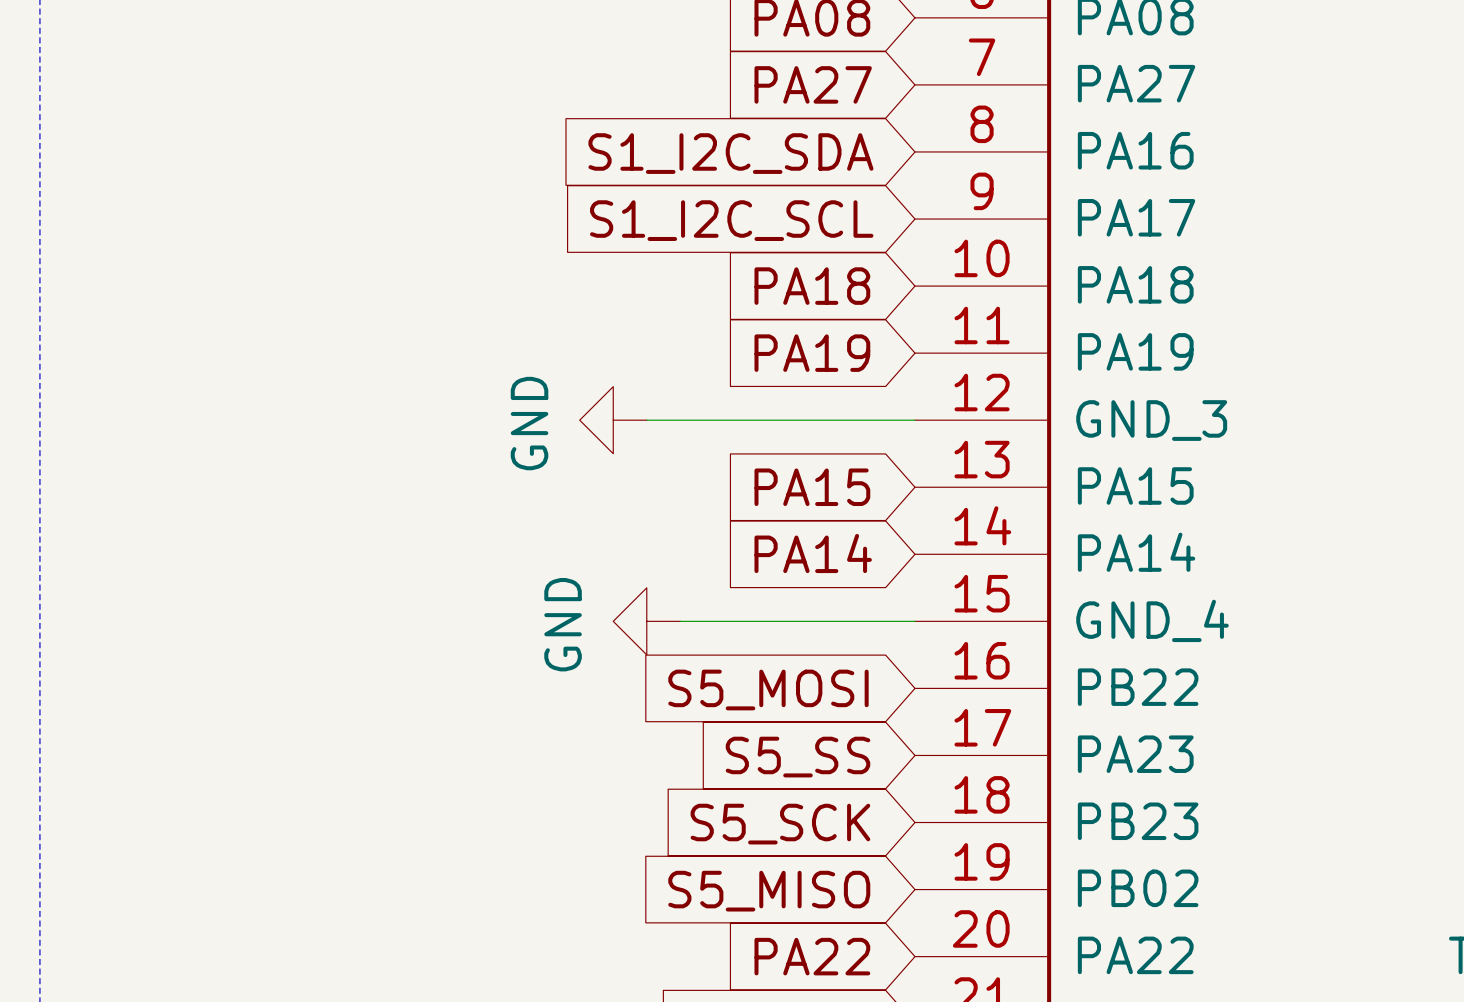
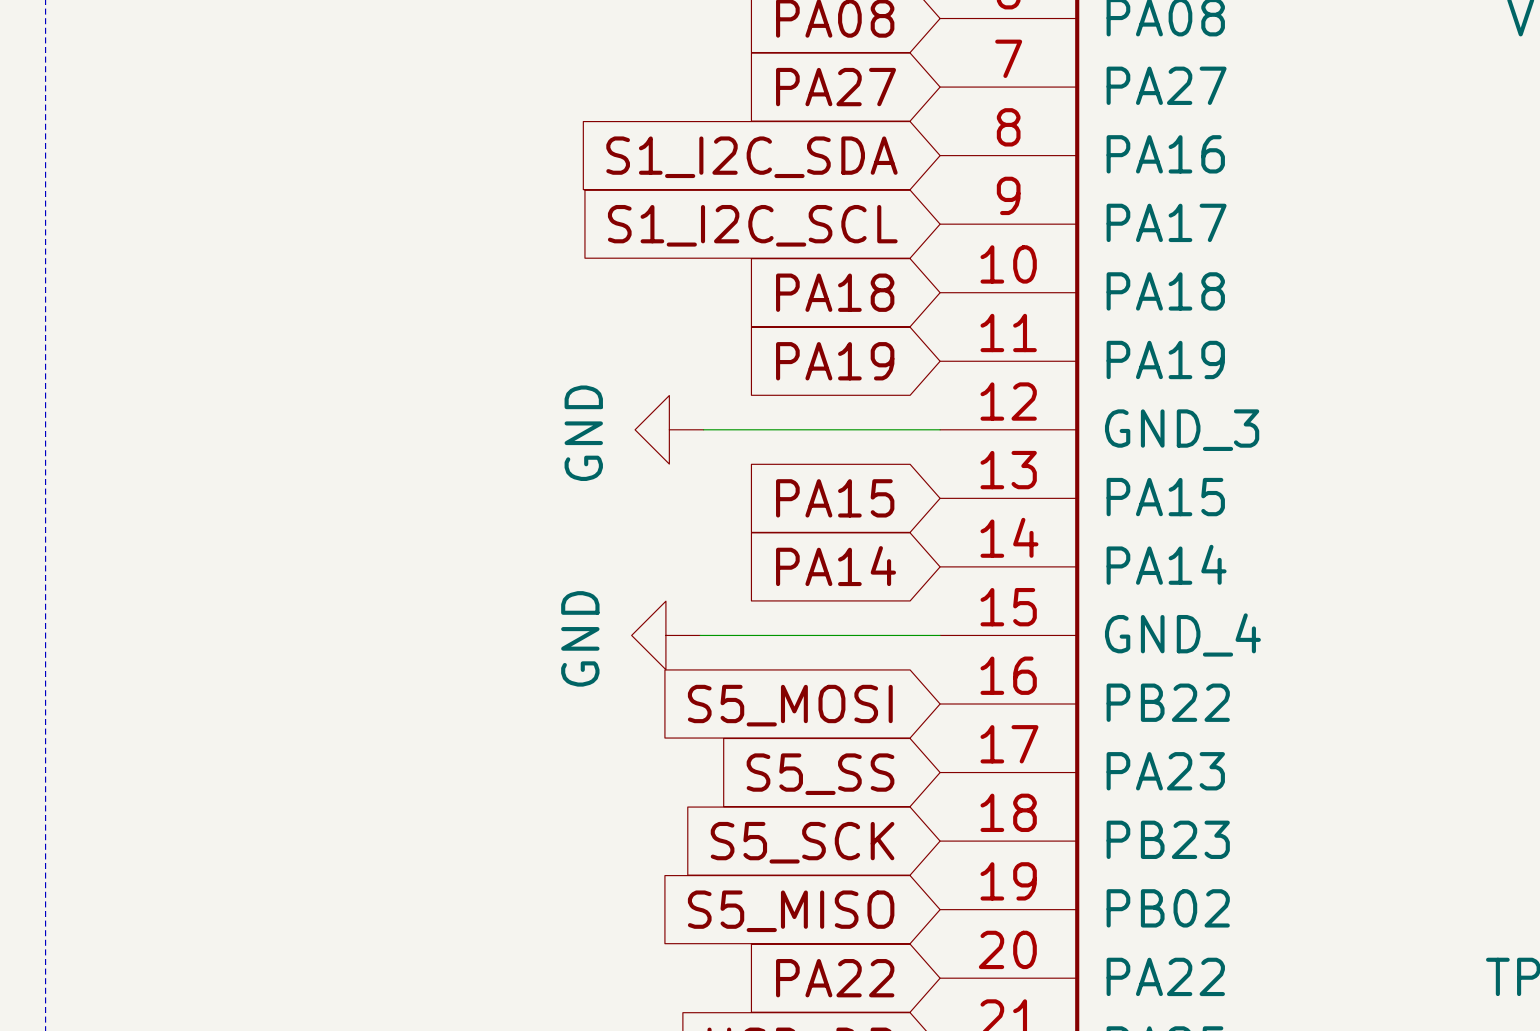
power symbol position: GND (613, 420) -> GND (669, 429)

